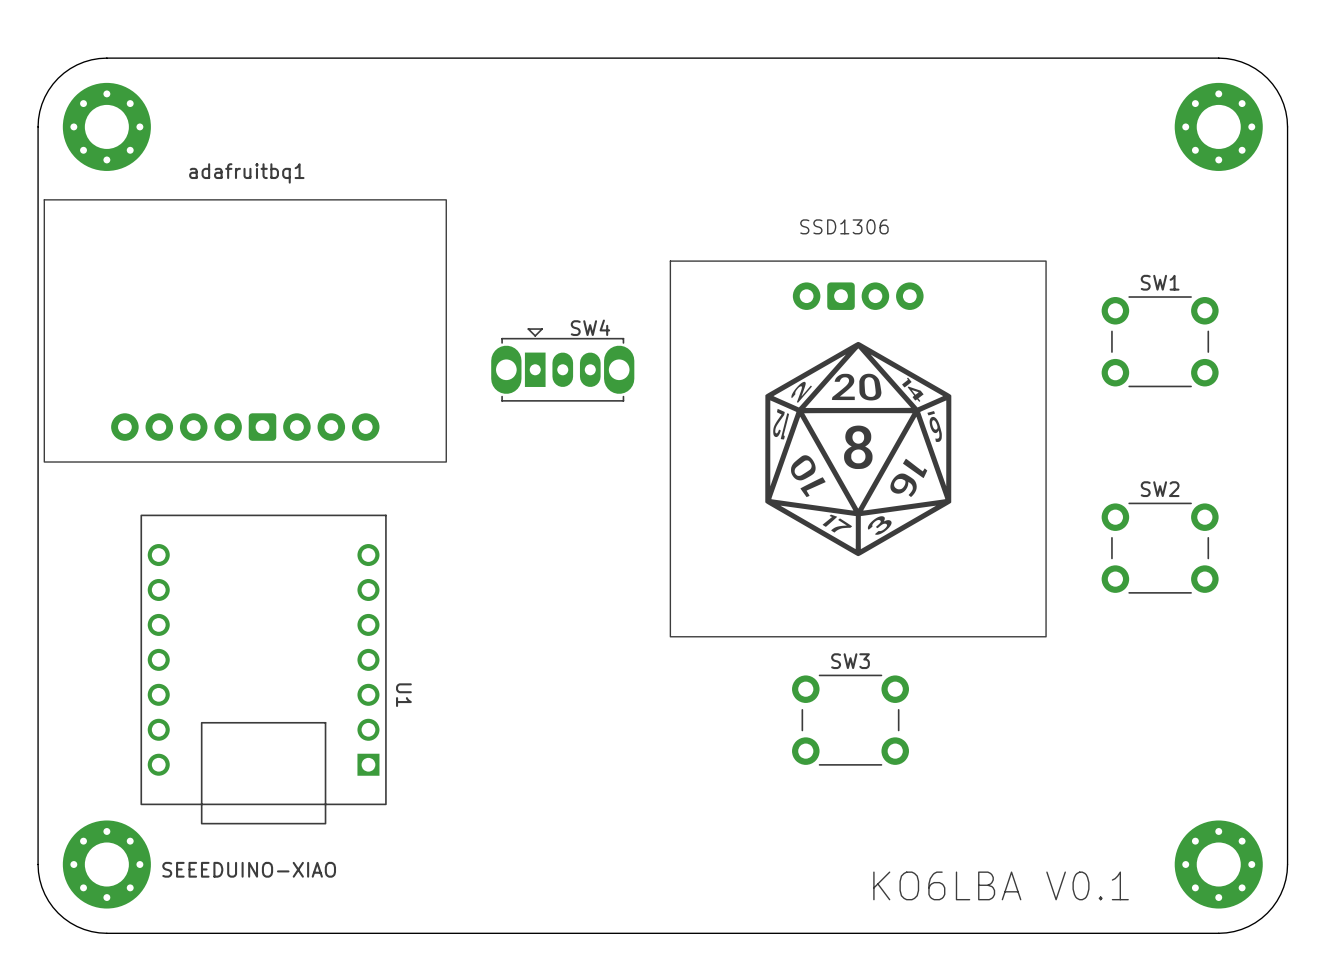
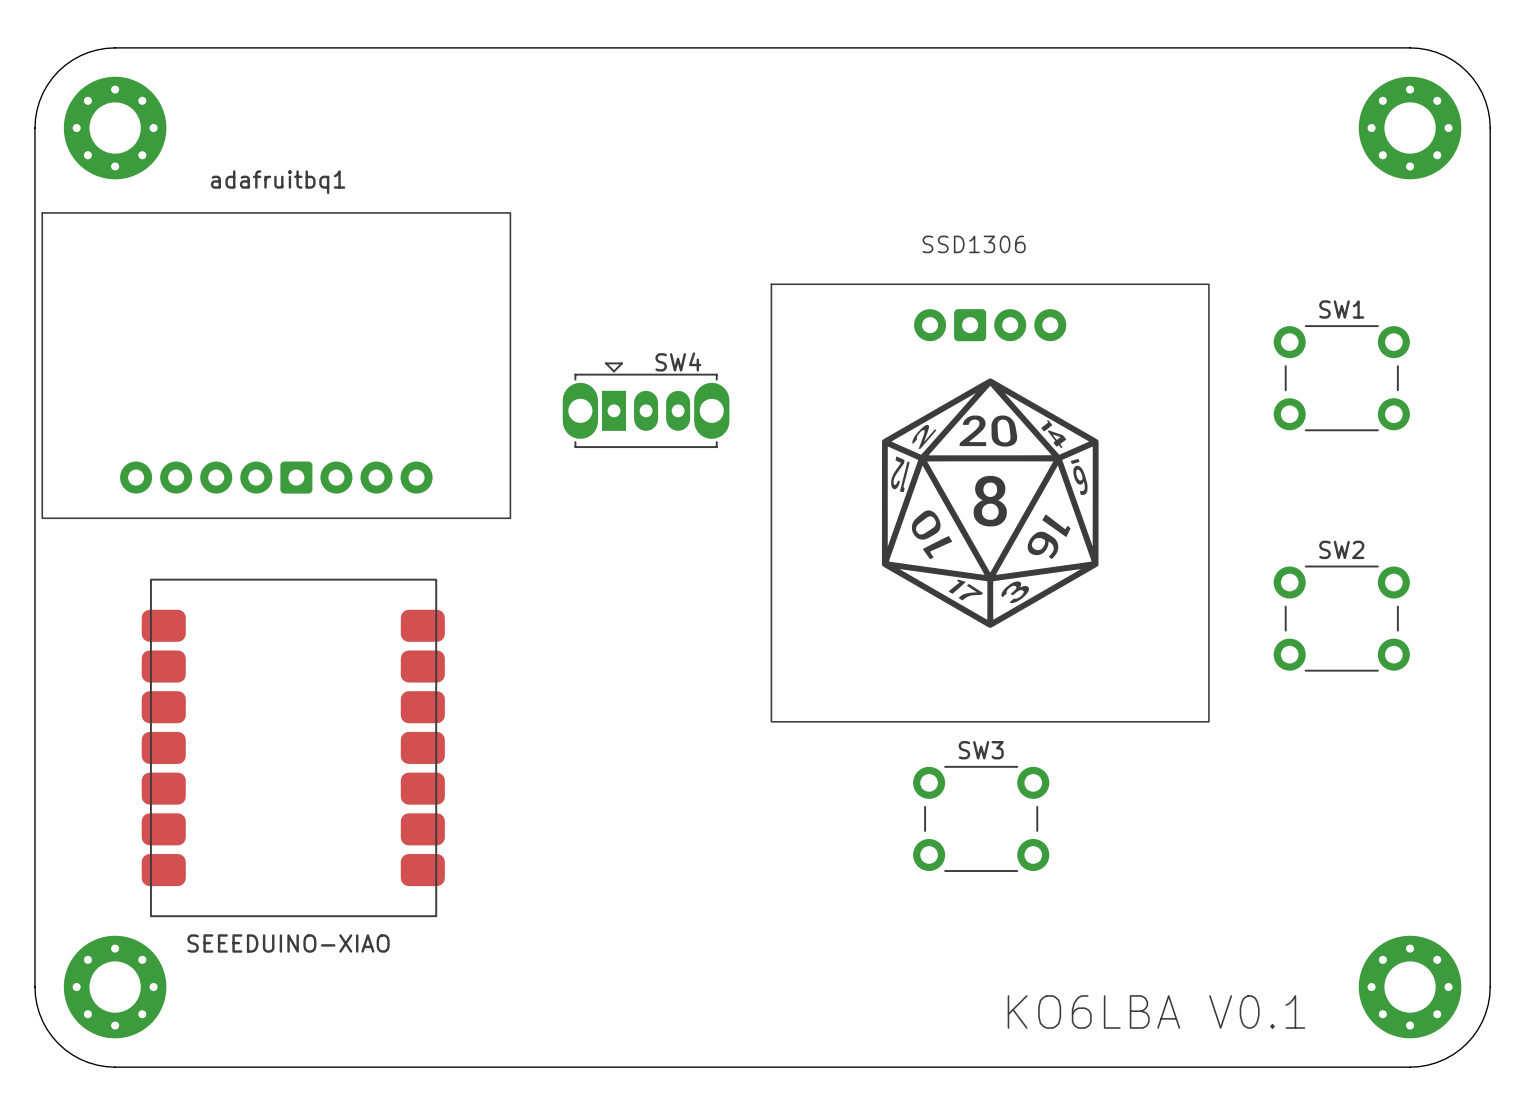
part: none -> (293, 747)
U1: (263, 669) -> none
text position: SEEEDUINO-XIAO (249, 869) -> SEEEDUINO-XIAO (288, 943)

